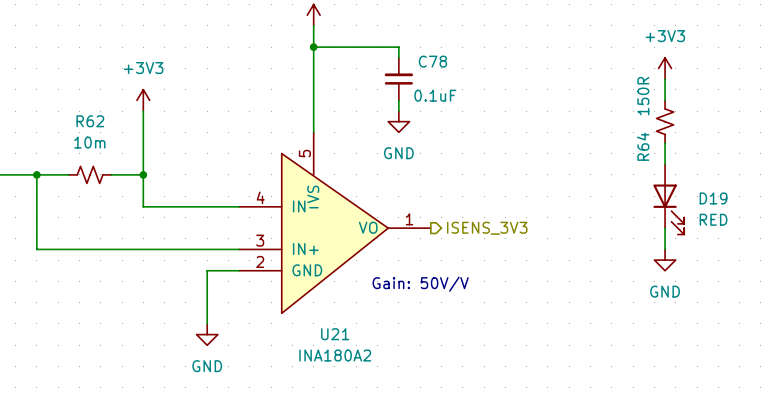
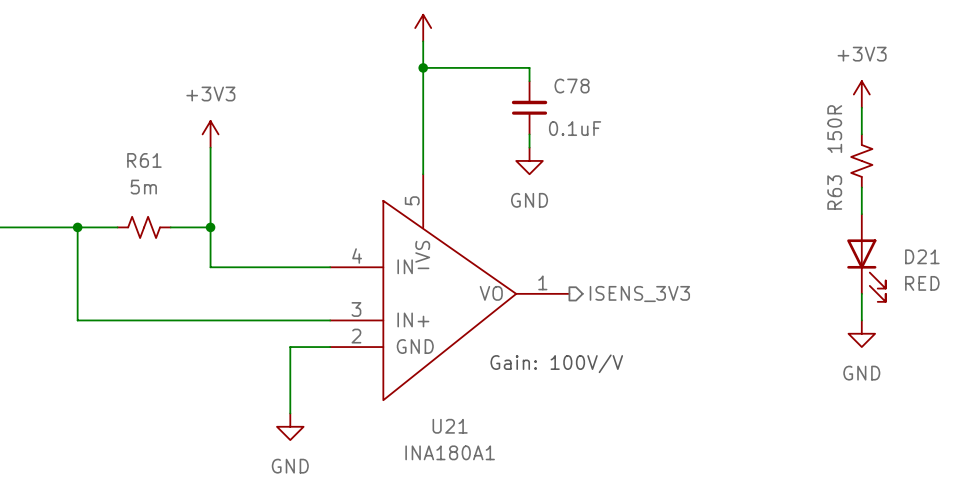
R62 name: R62 (90, 121) -> R61 (144, 160)
R62 value: 10m (89, 142) -> 5m (143, 187)
R64 name: R64 (643, 146) -> R63 (834, 192)
D19 name: D19 (713, 198) -> D21 (922, 256)
text: Gain: 50V/V (420, 284) -> Gain: 100V/V (556, 363)
U21 value: INA180A2 (335, 355) -> INA180A1 (450, 452)

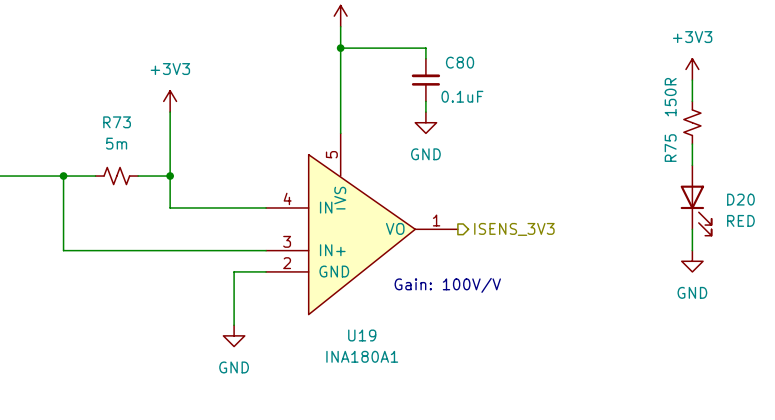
C78 name: C78 (572, 86) -> C80 (460, 62)
R61 name: R61 (144, 160) -> R73 (117, 122)
R63 name: R63 (834, 192) -> R75 (670, 148)
D21 name: D21 (922, 256) -> D20 (740, 199)
U21 name: U21 (450, 426) -> U19 (362, 335)

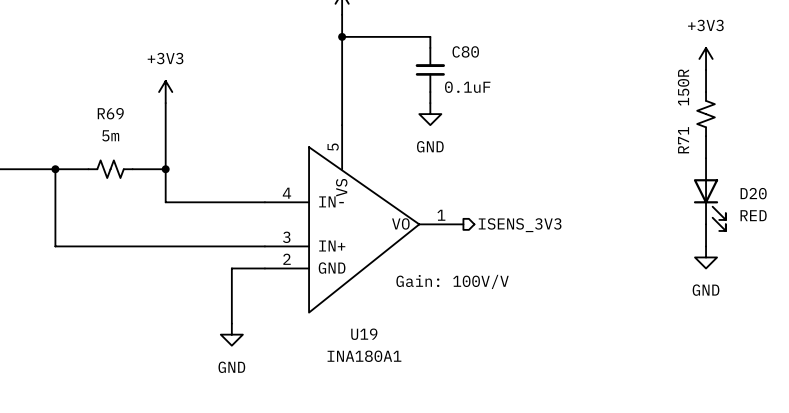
R73 name: R73 (117, 122) -> R69 (110, 113)
R75 name: R75 (670, 148) -> R71 (683, 140)

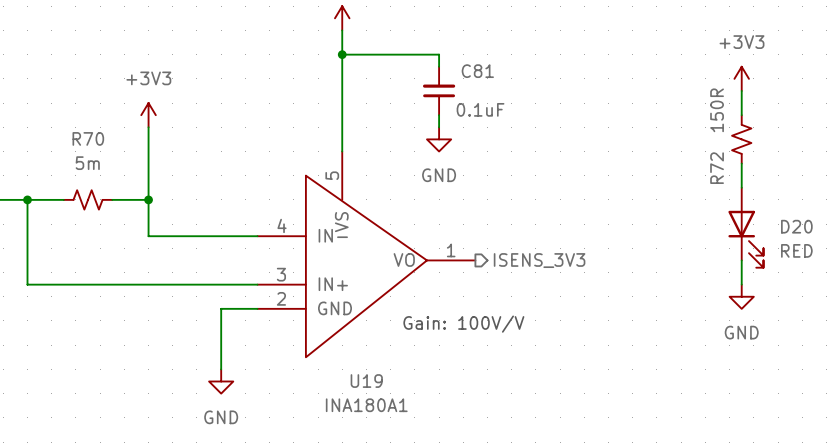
C80 name: C80 (465, 51) -> C81 (477, 71)
R69 name: R69 (110, 113) -> R70 (88, 138)
R71 name: R71 (683, 140) -> R72 (717, 168)

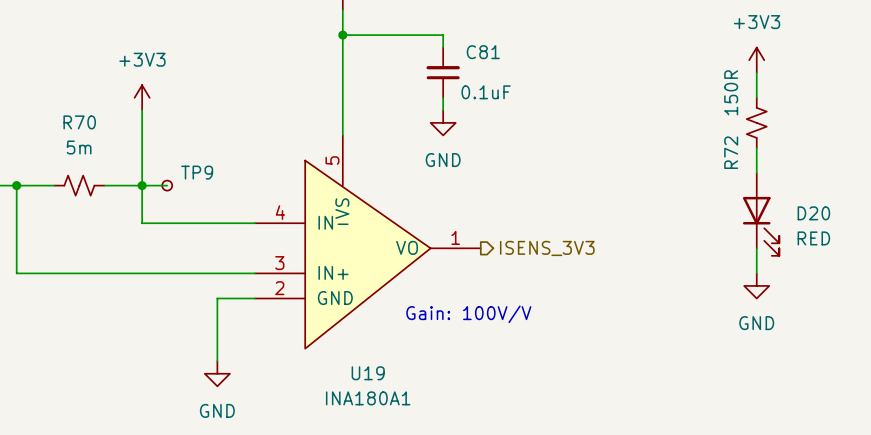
wire: none -> (142, 185) (167, 185)
TP9: none -> (167, 185)

